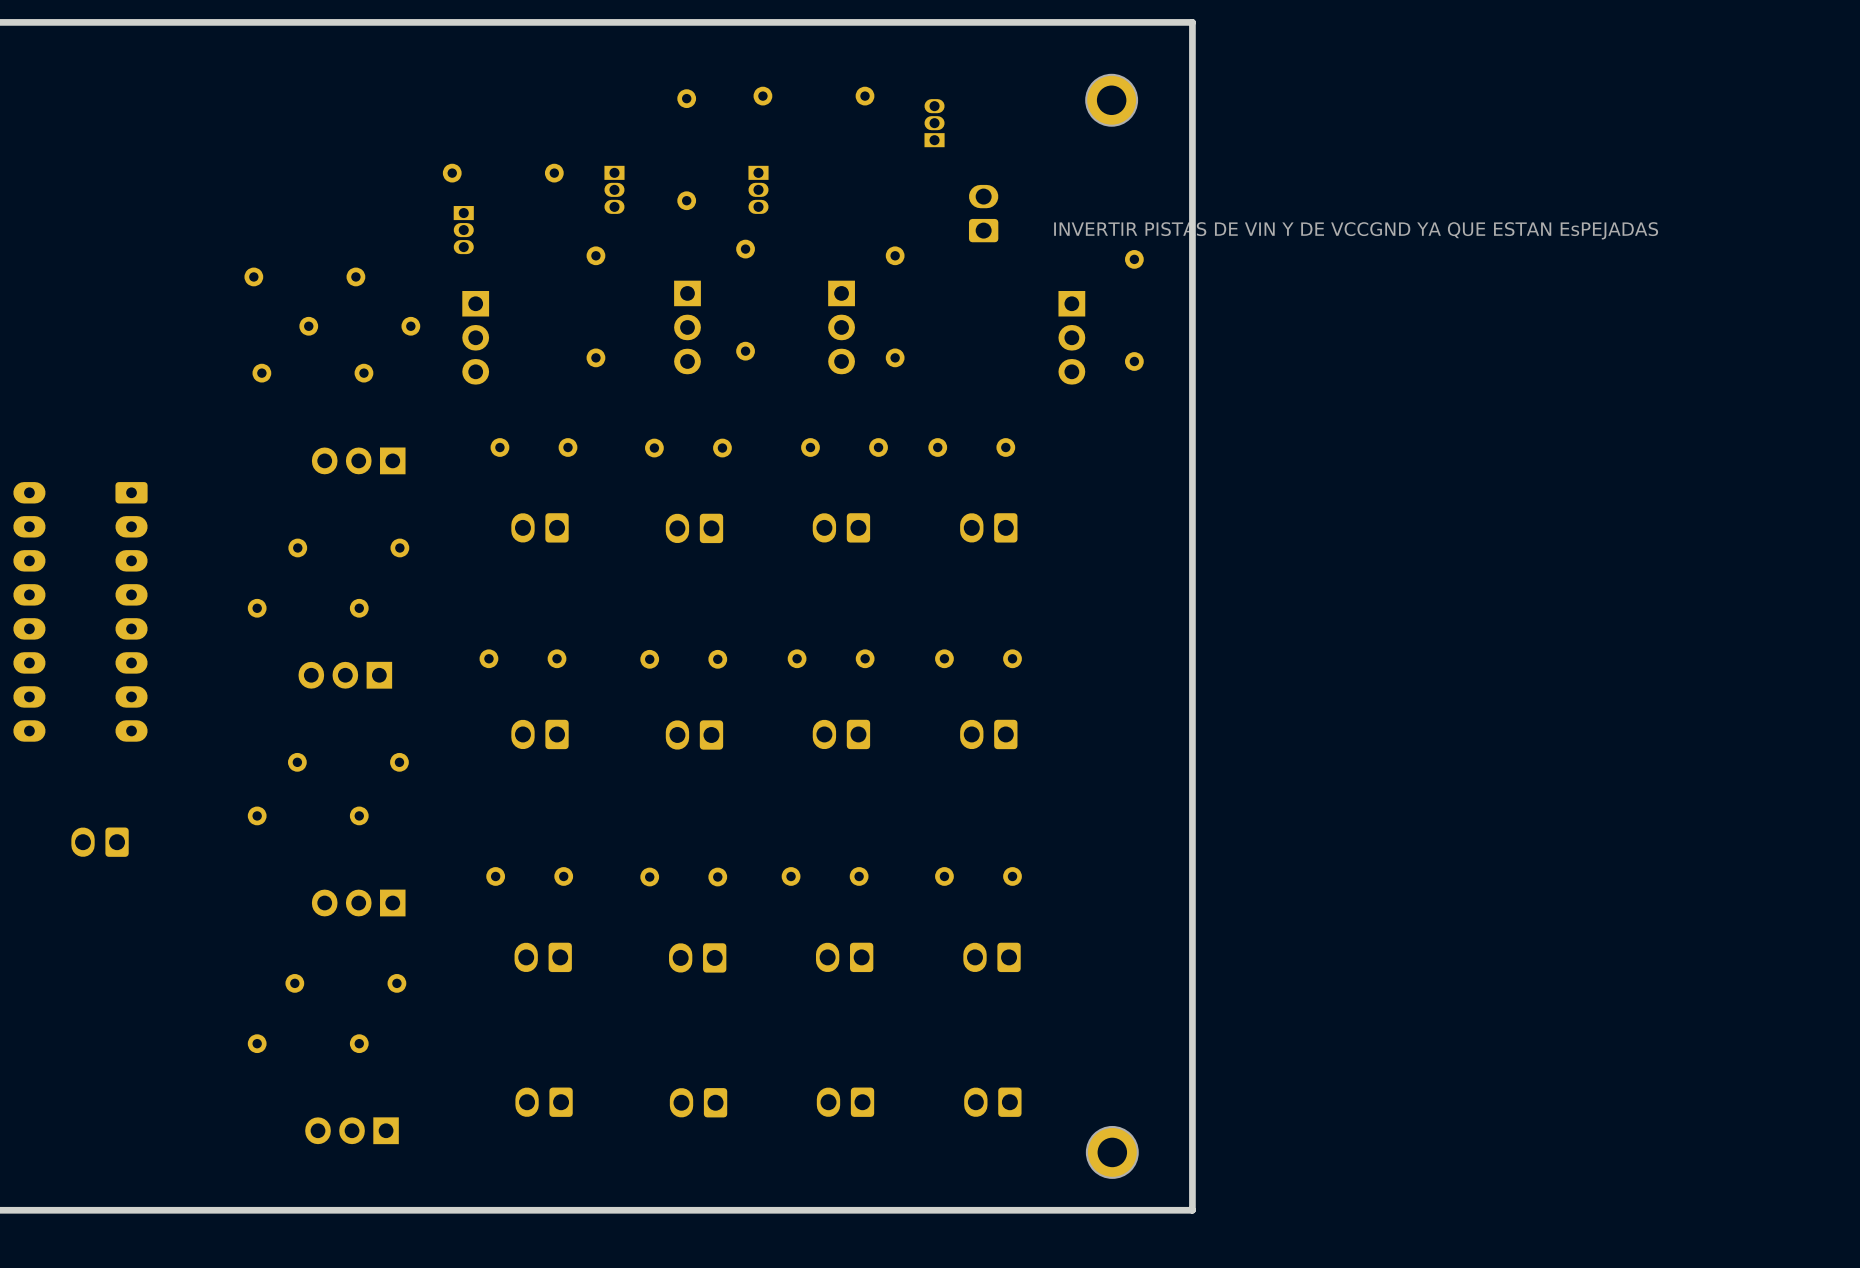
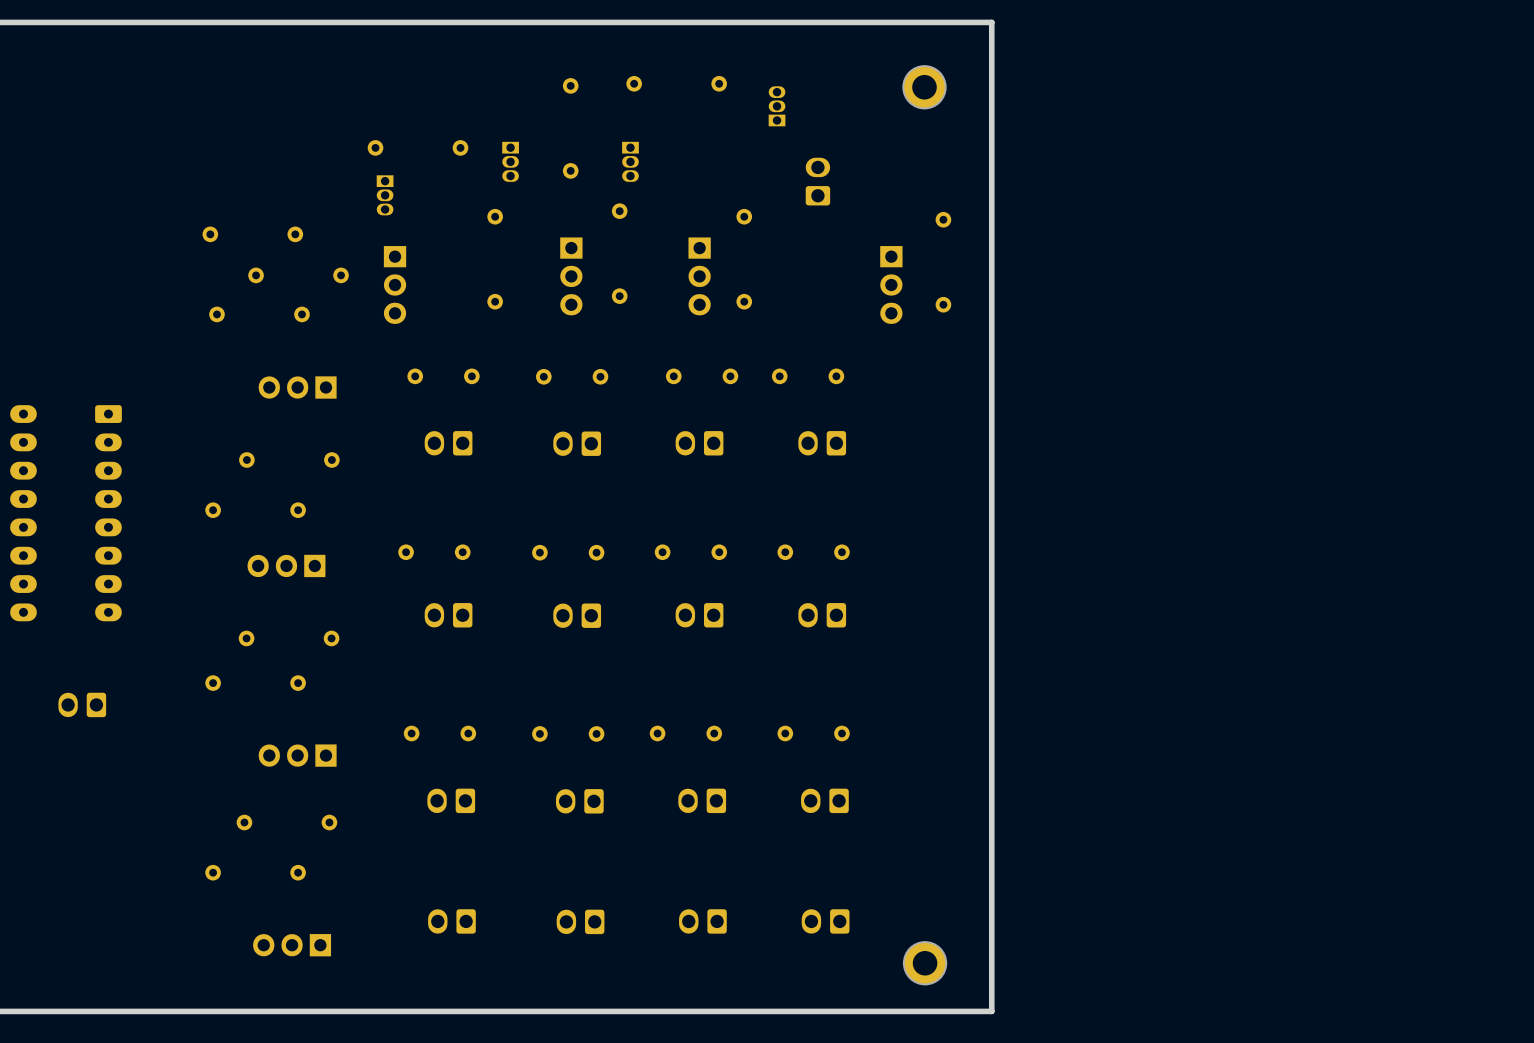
text: INVERTIR PISTAS DE VIN Y DE VCCGND YA QUE ESTAN EsPEJADAS (1356, 230) -> none

